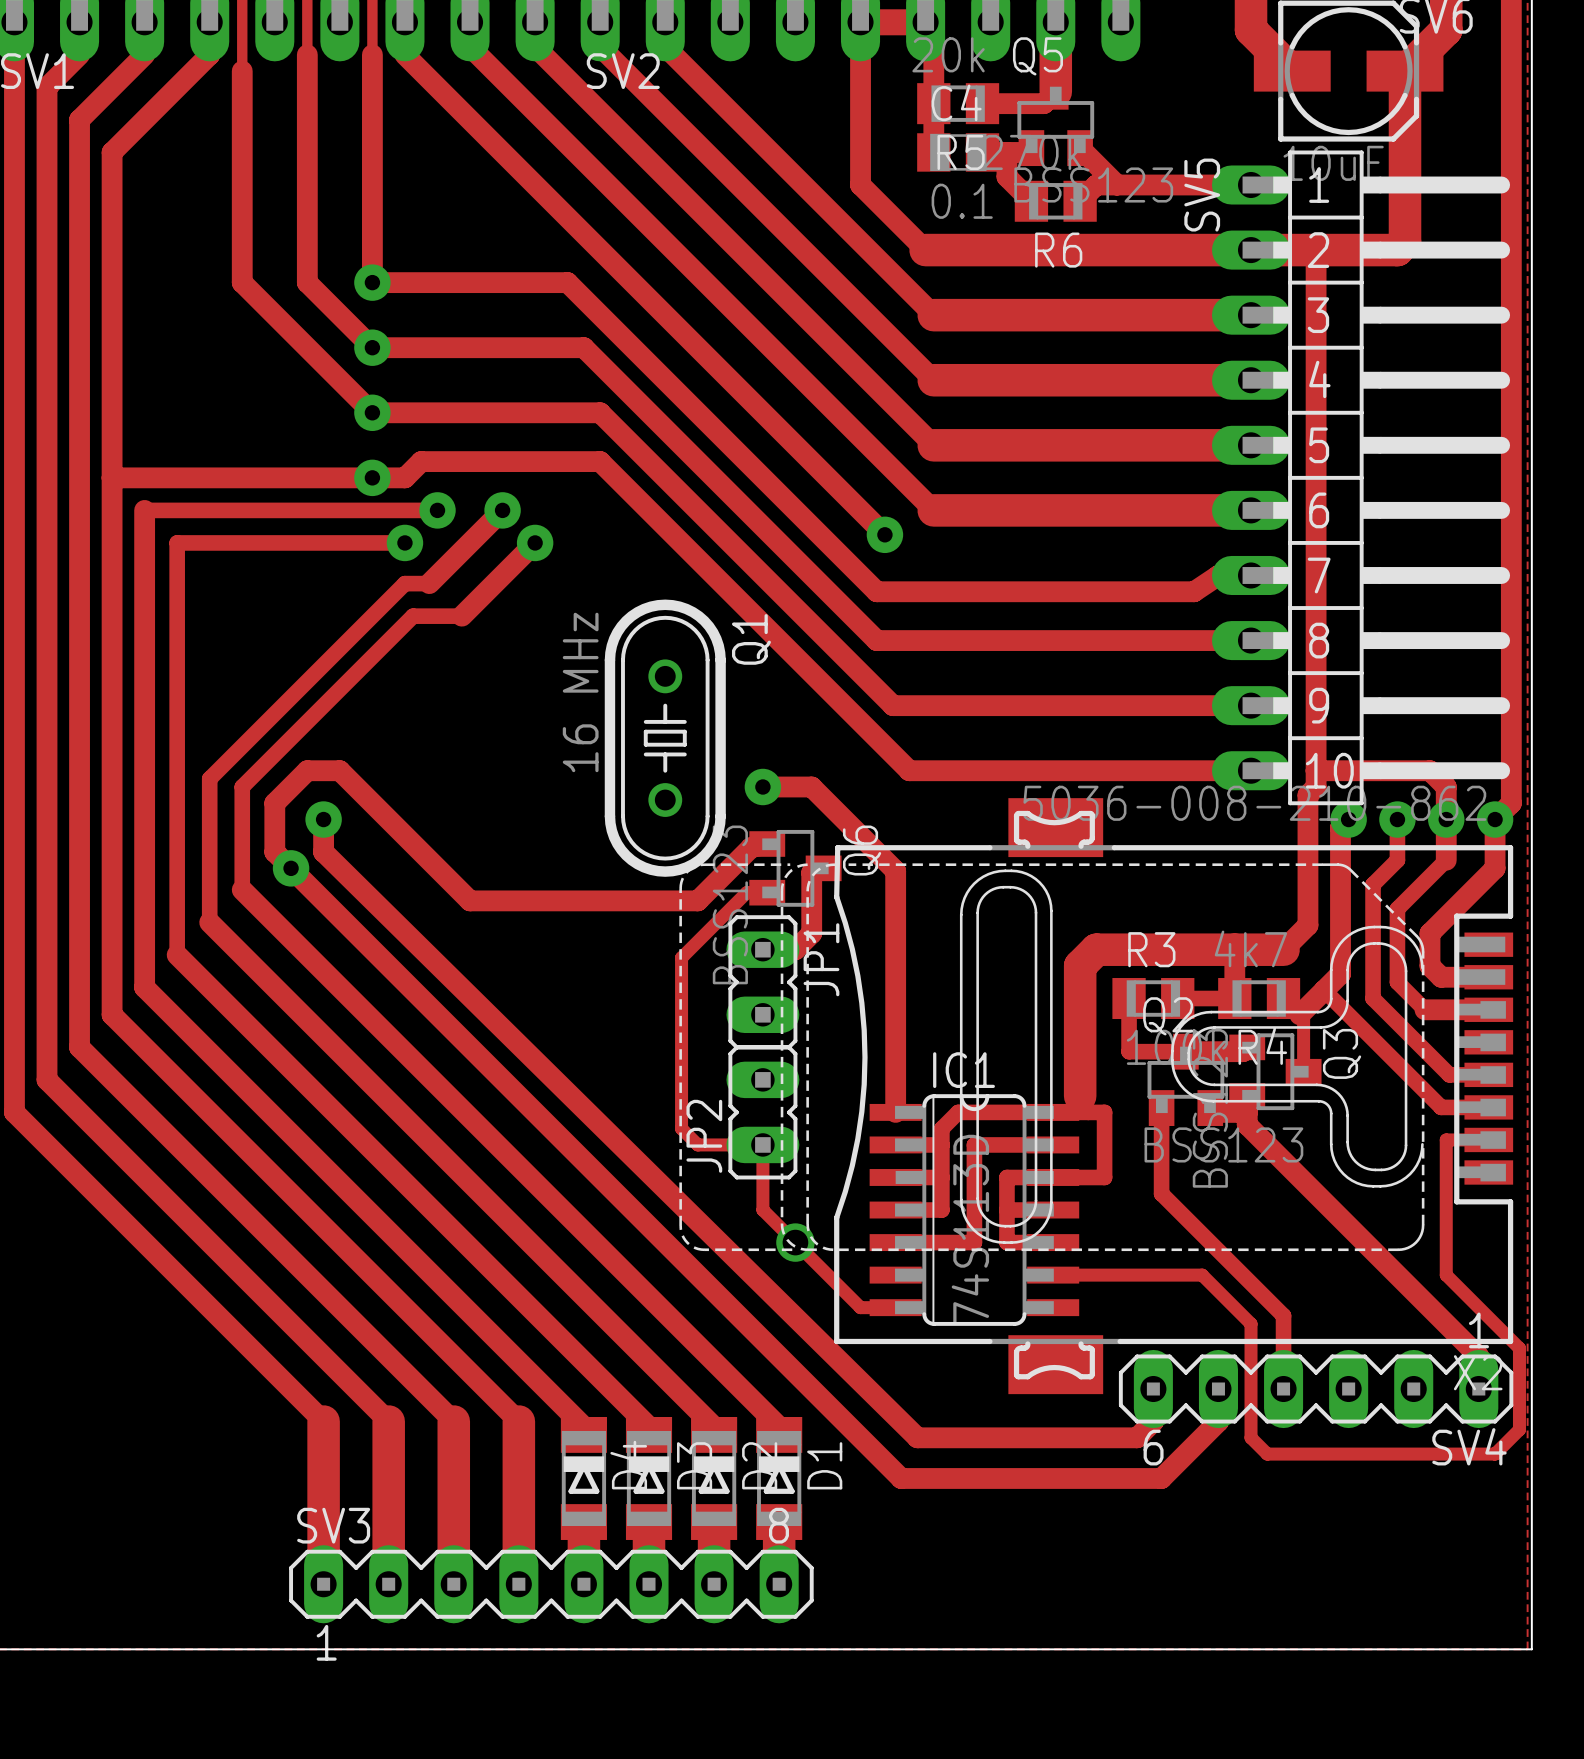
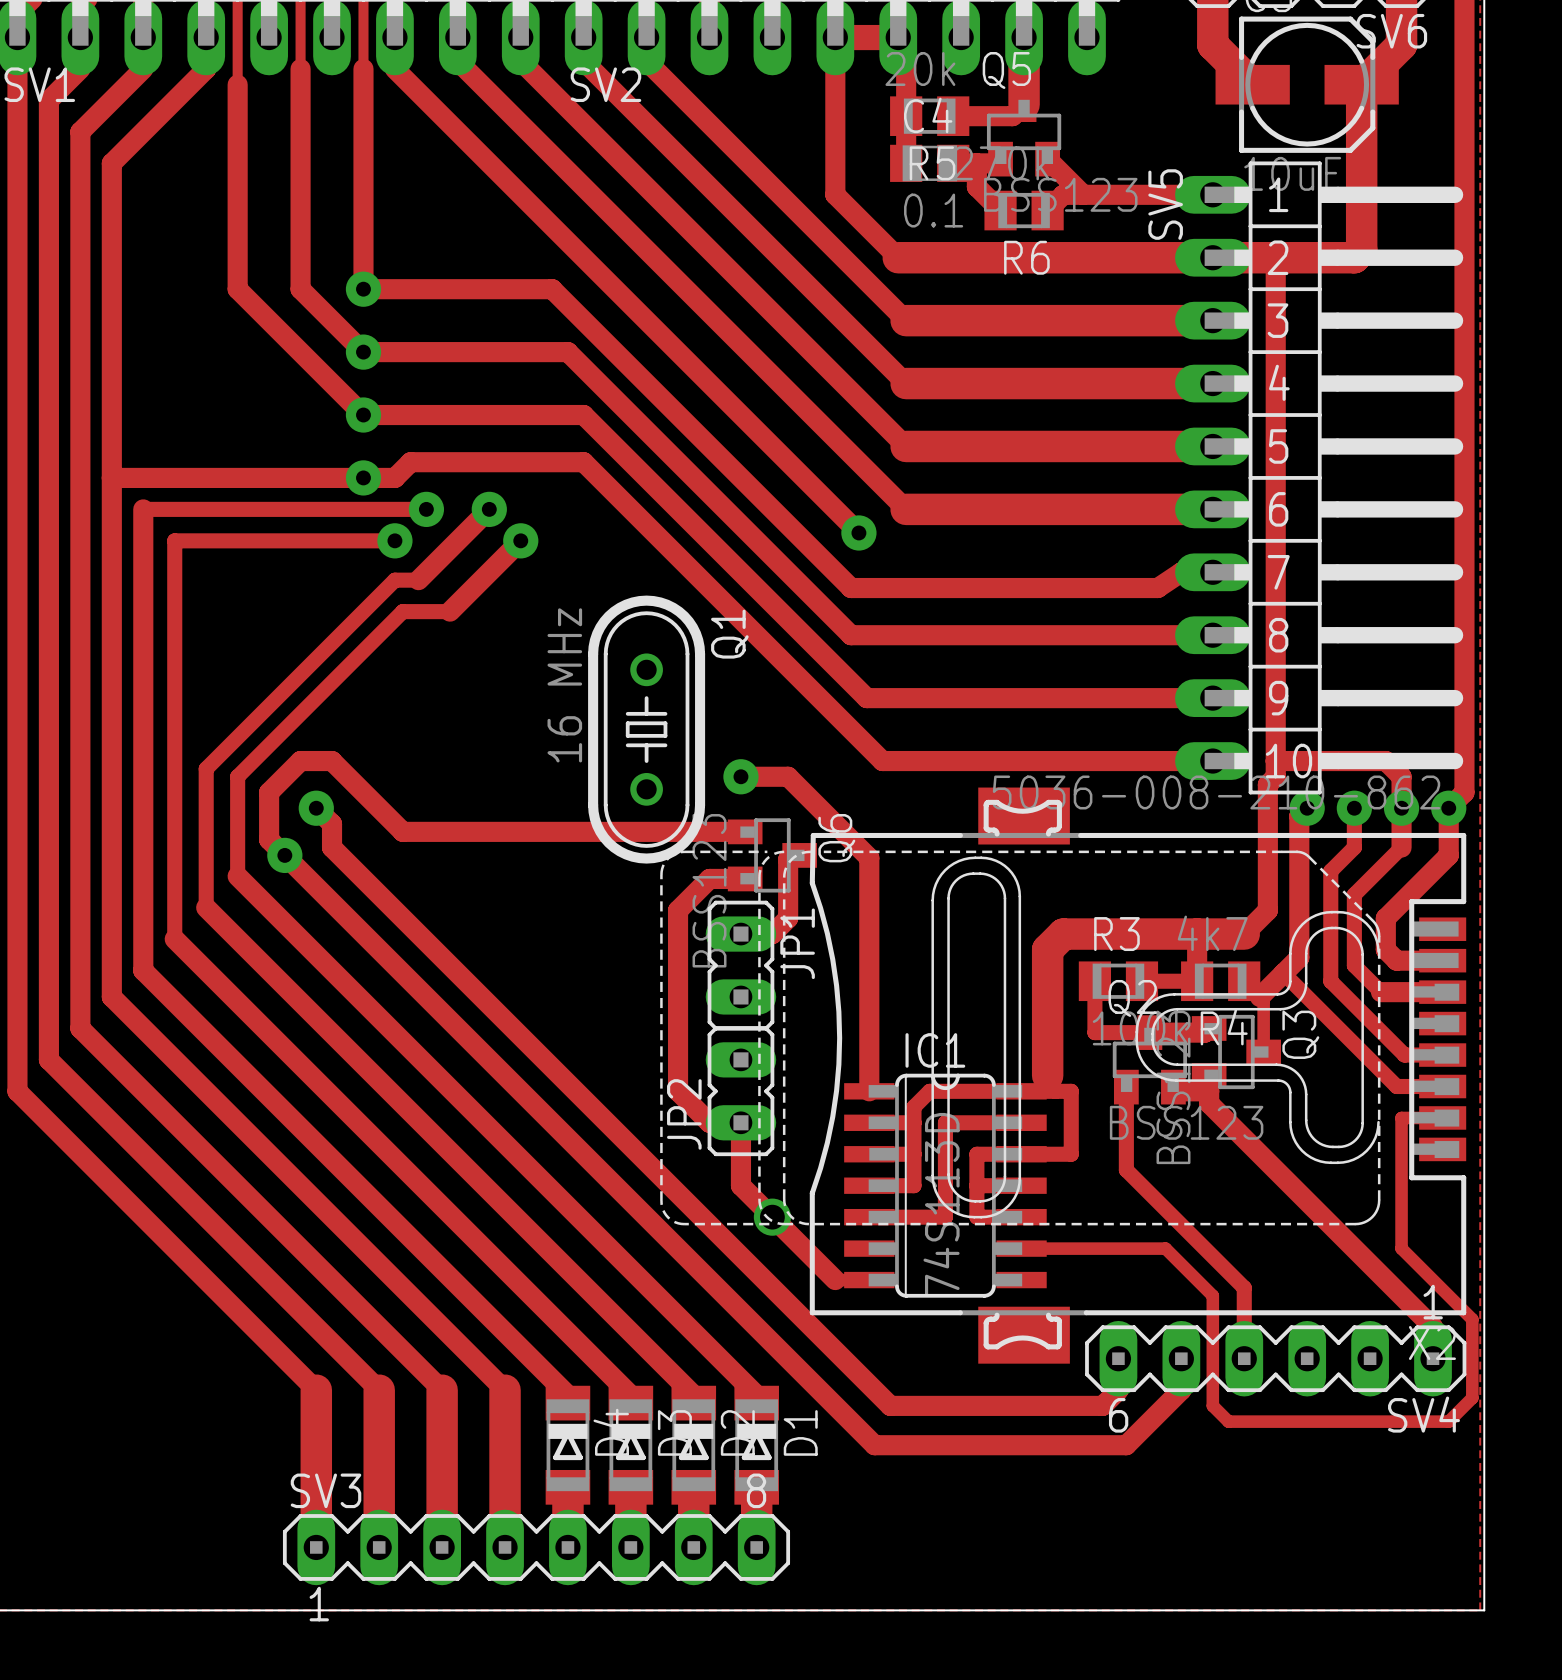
track: (323, 819) (323, 852) (917, 1437) -> (316, 808) (332, 823) (332, 847) (890, 1405)
track: (413, 844) (470, 900) (697, 900) (750, 847) (767, 844) -> (402, 831) (745, 831)
track: (746, 892) (681, 957) (681, 1128) (697, 1144) (730, 1144) -> (725, 878) (709, 878) (678, 910) (678, 1091) (709, 1122)
track width: thin (730, 1144) (762, 1144) (762, 1210) (860, 1307) -> thick (709, 1122) (740, 1122) (740, 1185) (835, 1280)

